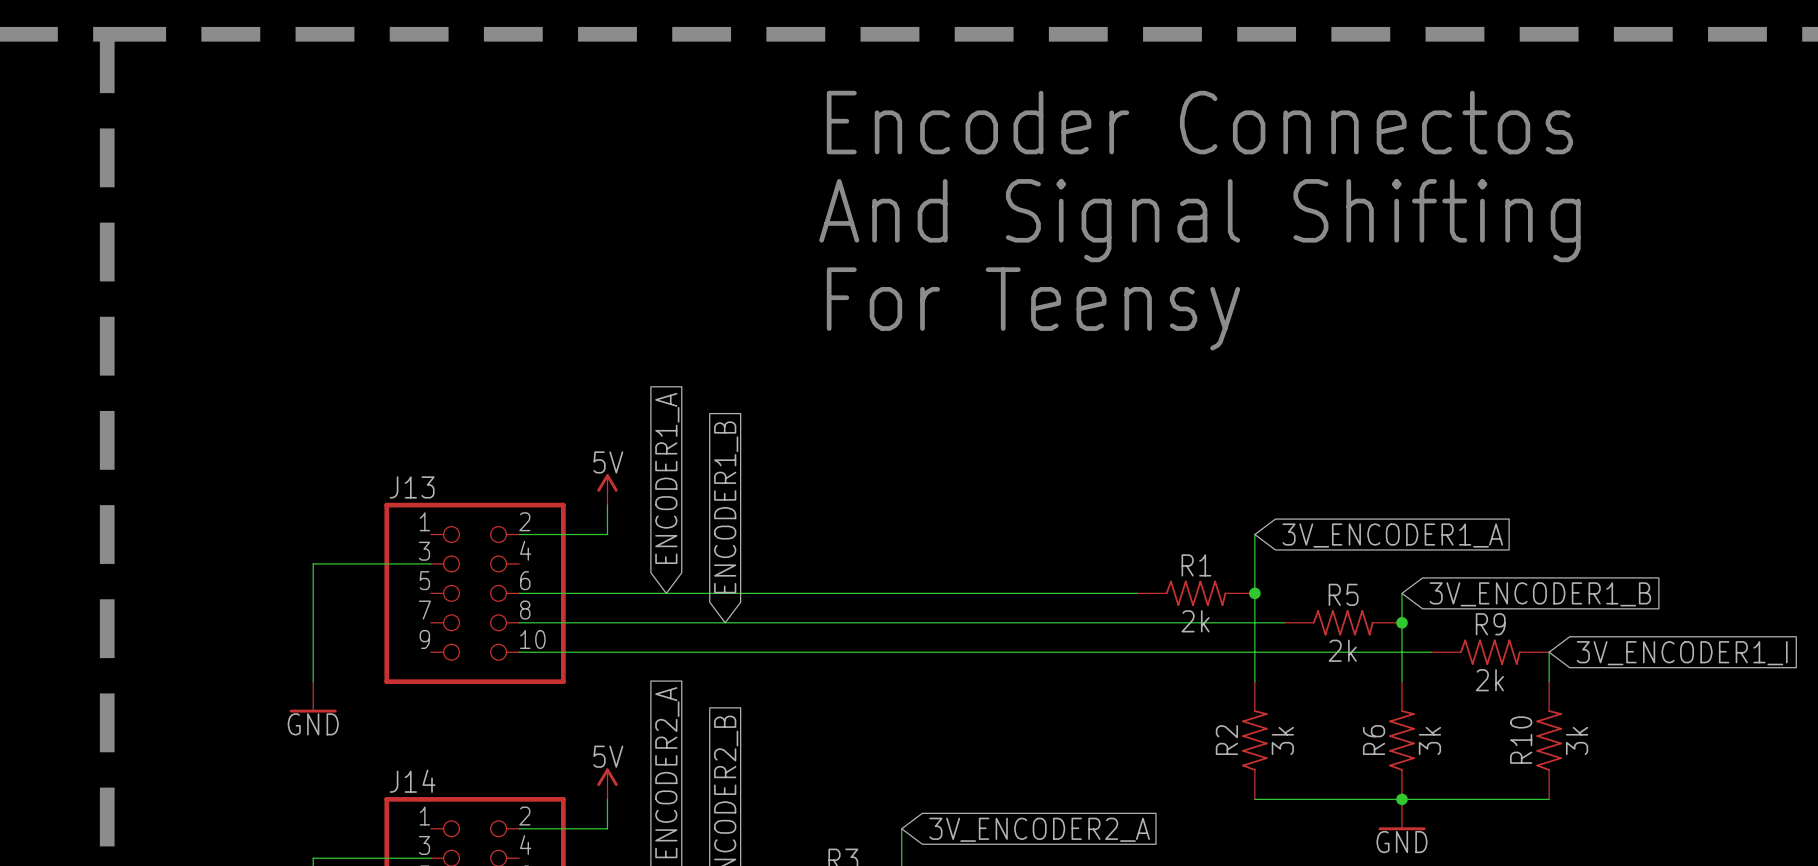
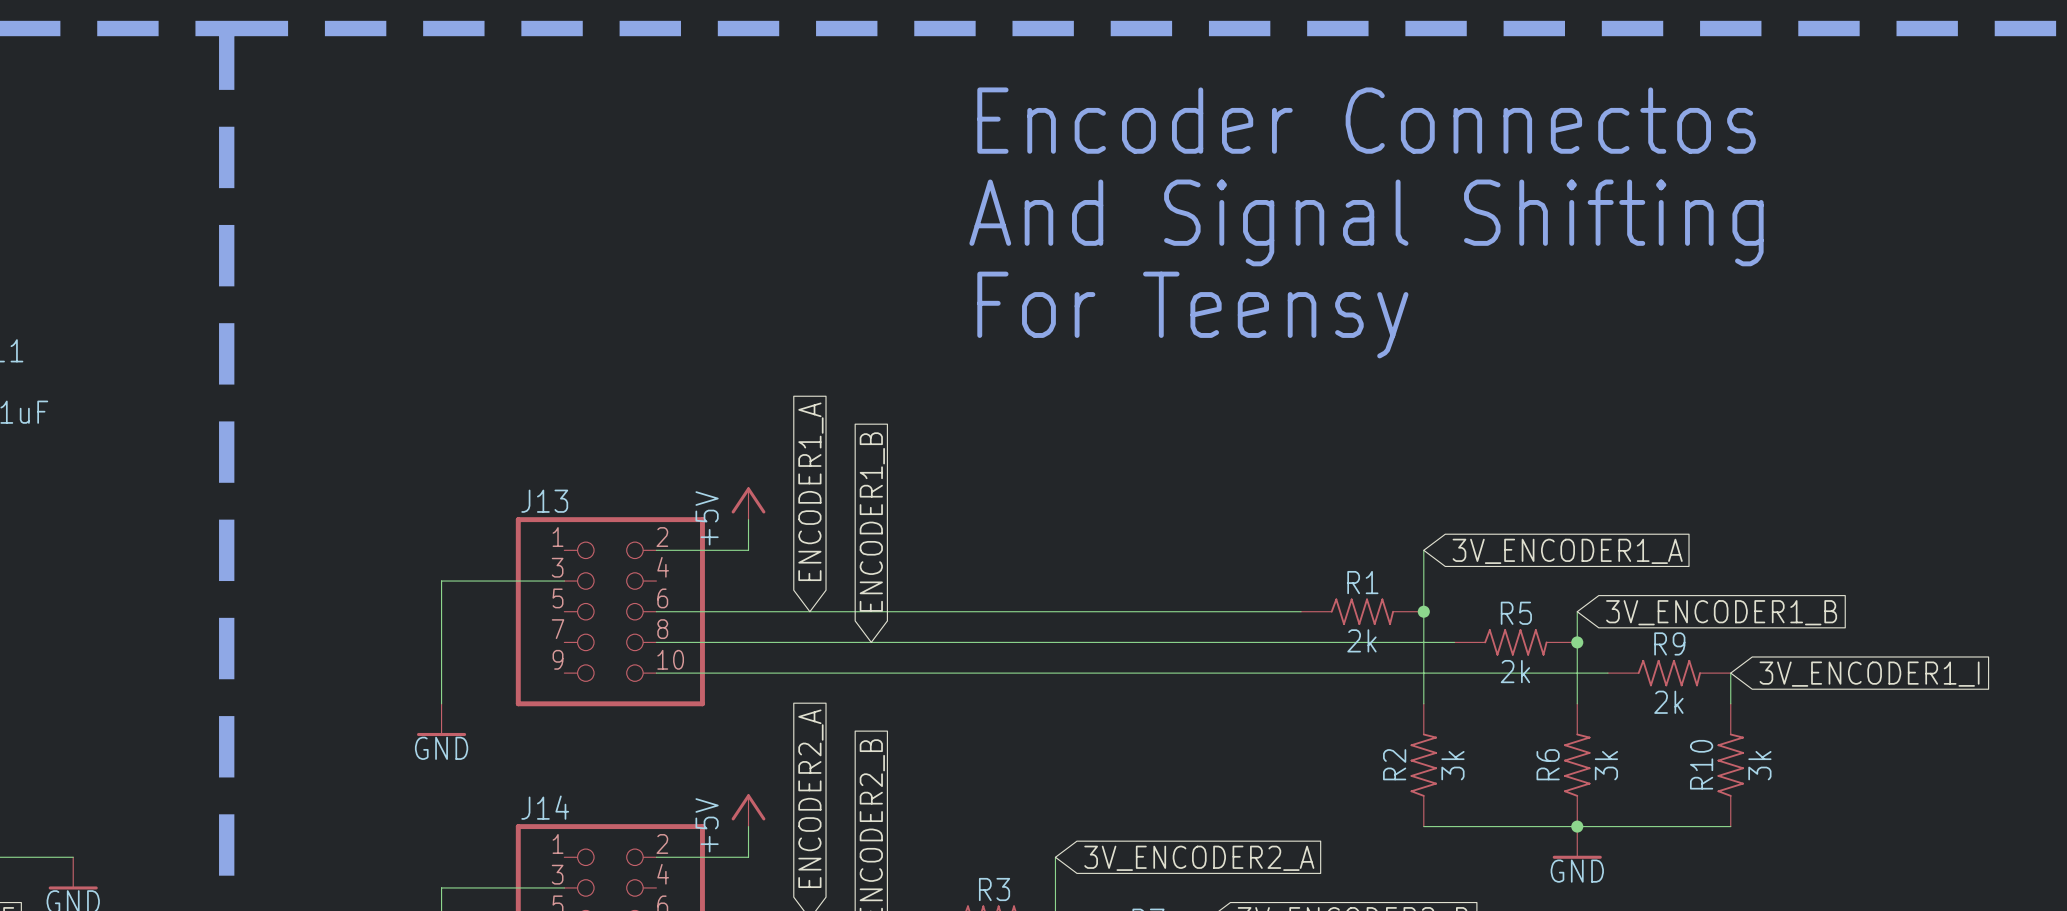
power symbol: 5V (607, 489) -> +5V (748, 503)
power symbol: 5V (607, 783) -> +5V (748, 810)

